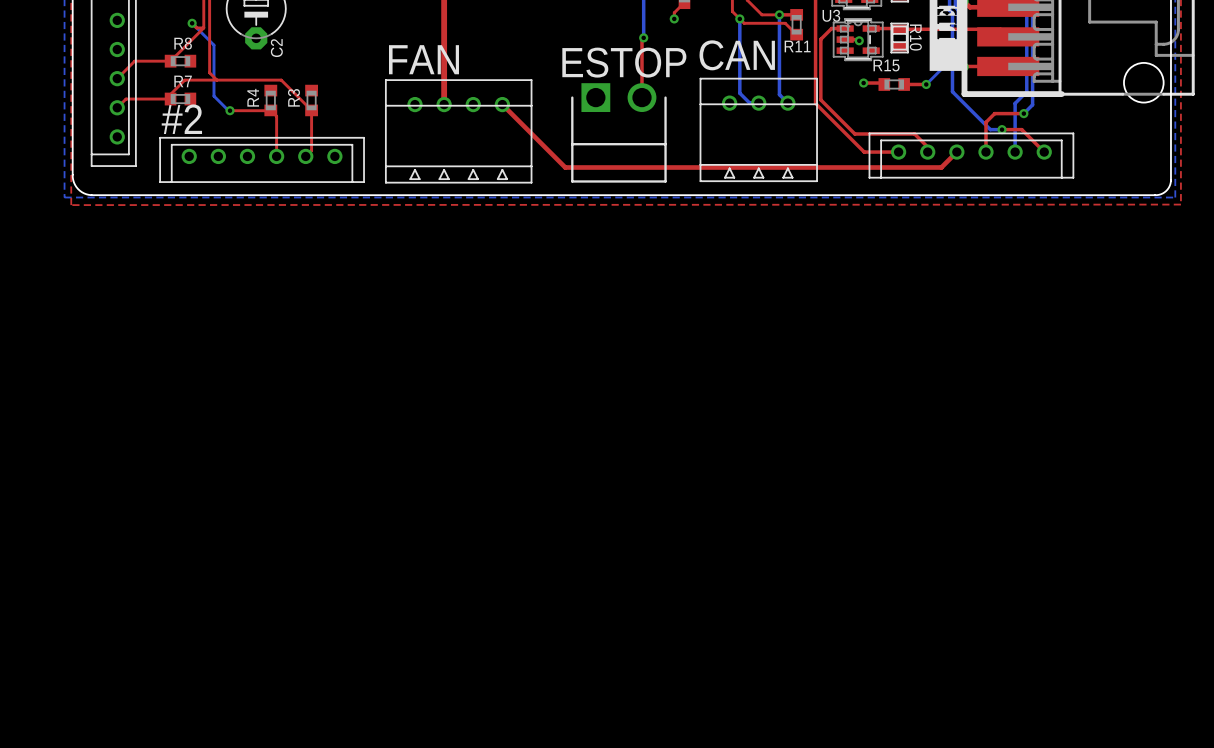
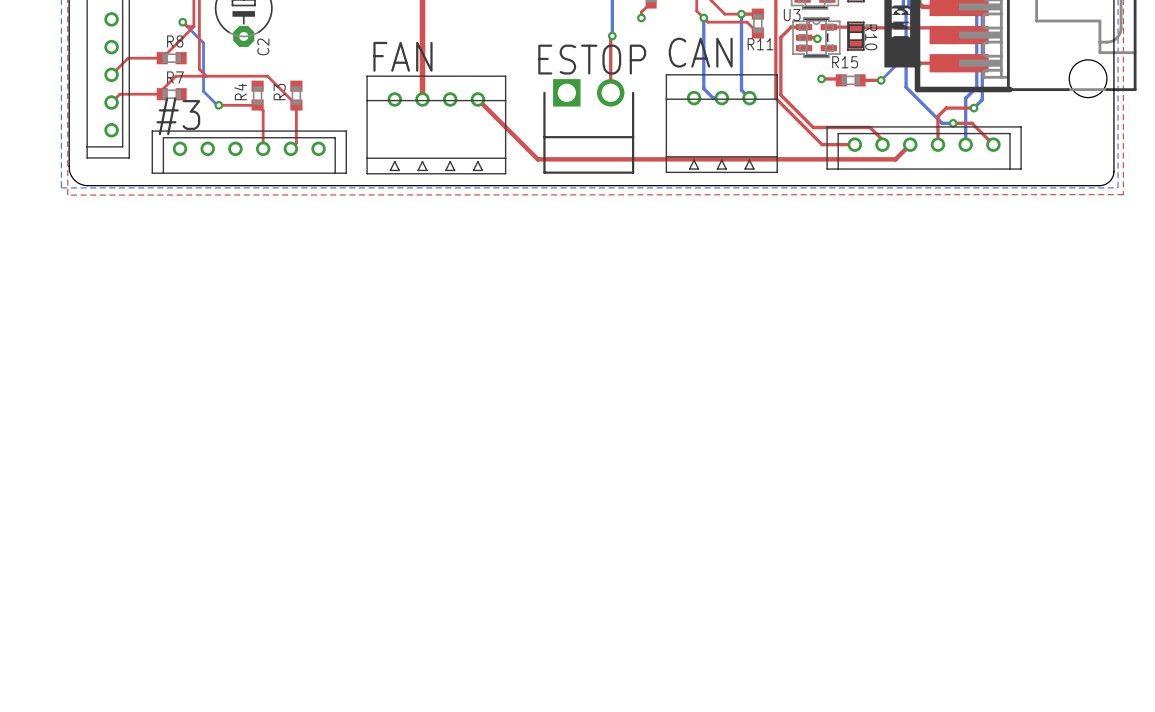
text: #2 (181, 119) -> #3 (178, 116)

